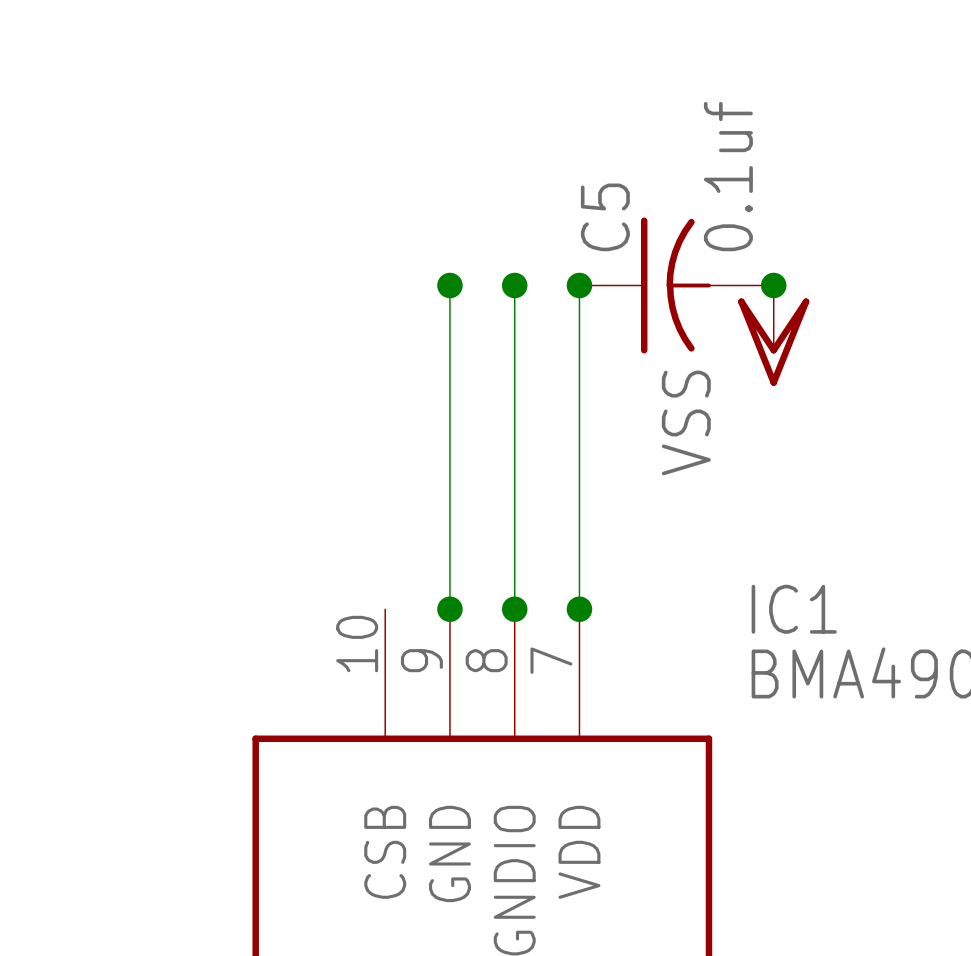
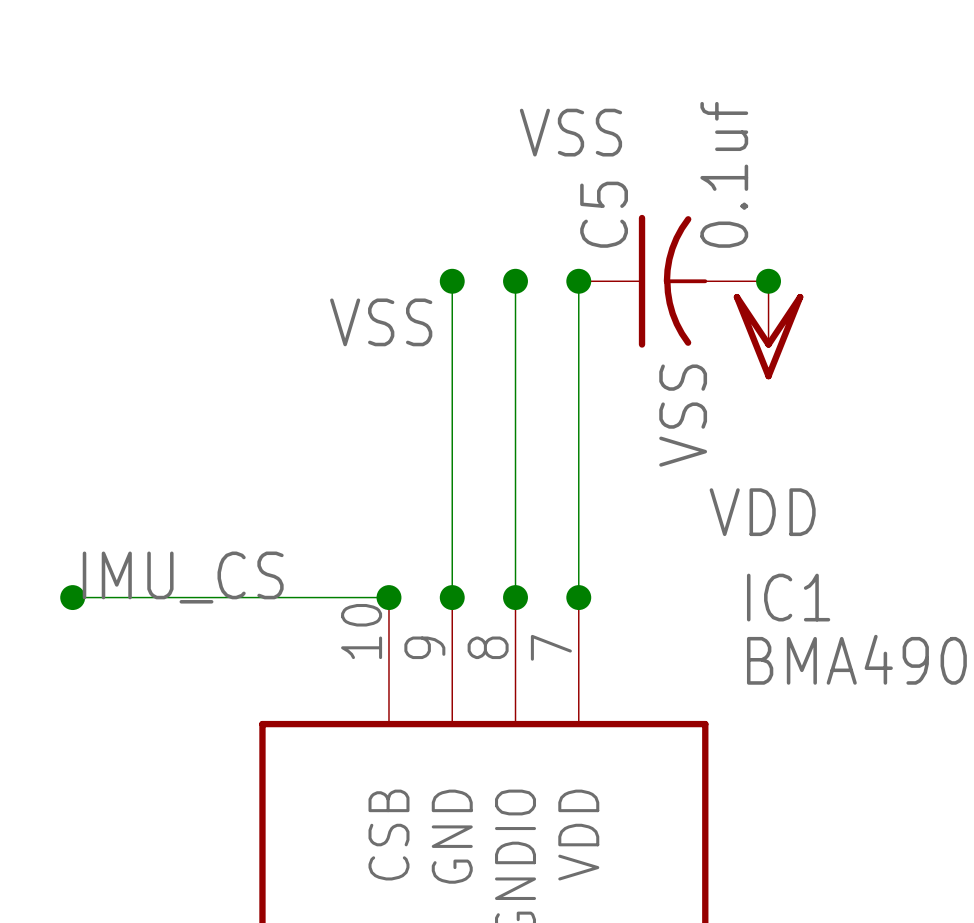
label: none -> VSS (570, 132)
label: none -> VSS (381, 322)
label: none -> VDD (762, 512)
label: none -> IMU_CS (183, 577)
wire: none -> (72, 597) (388, 597)
junction: none -> (72, 597)
junction: none -> (388, 597)

